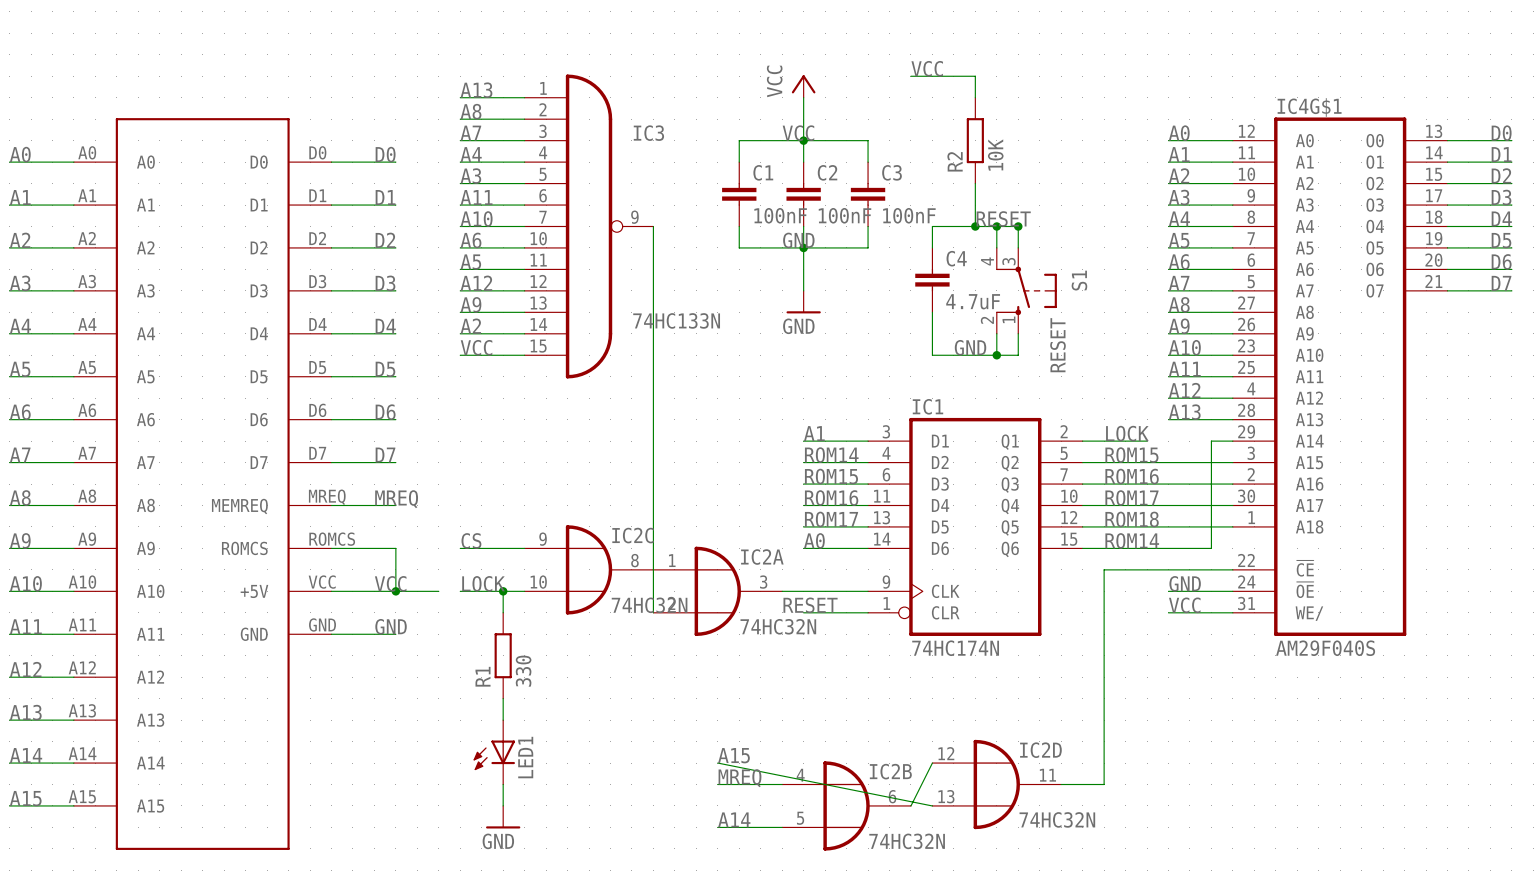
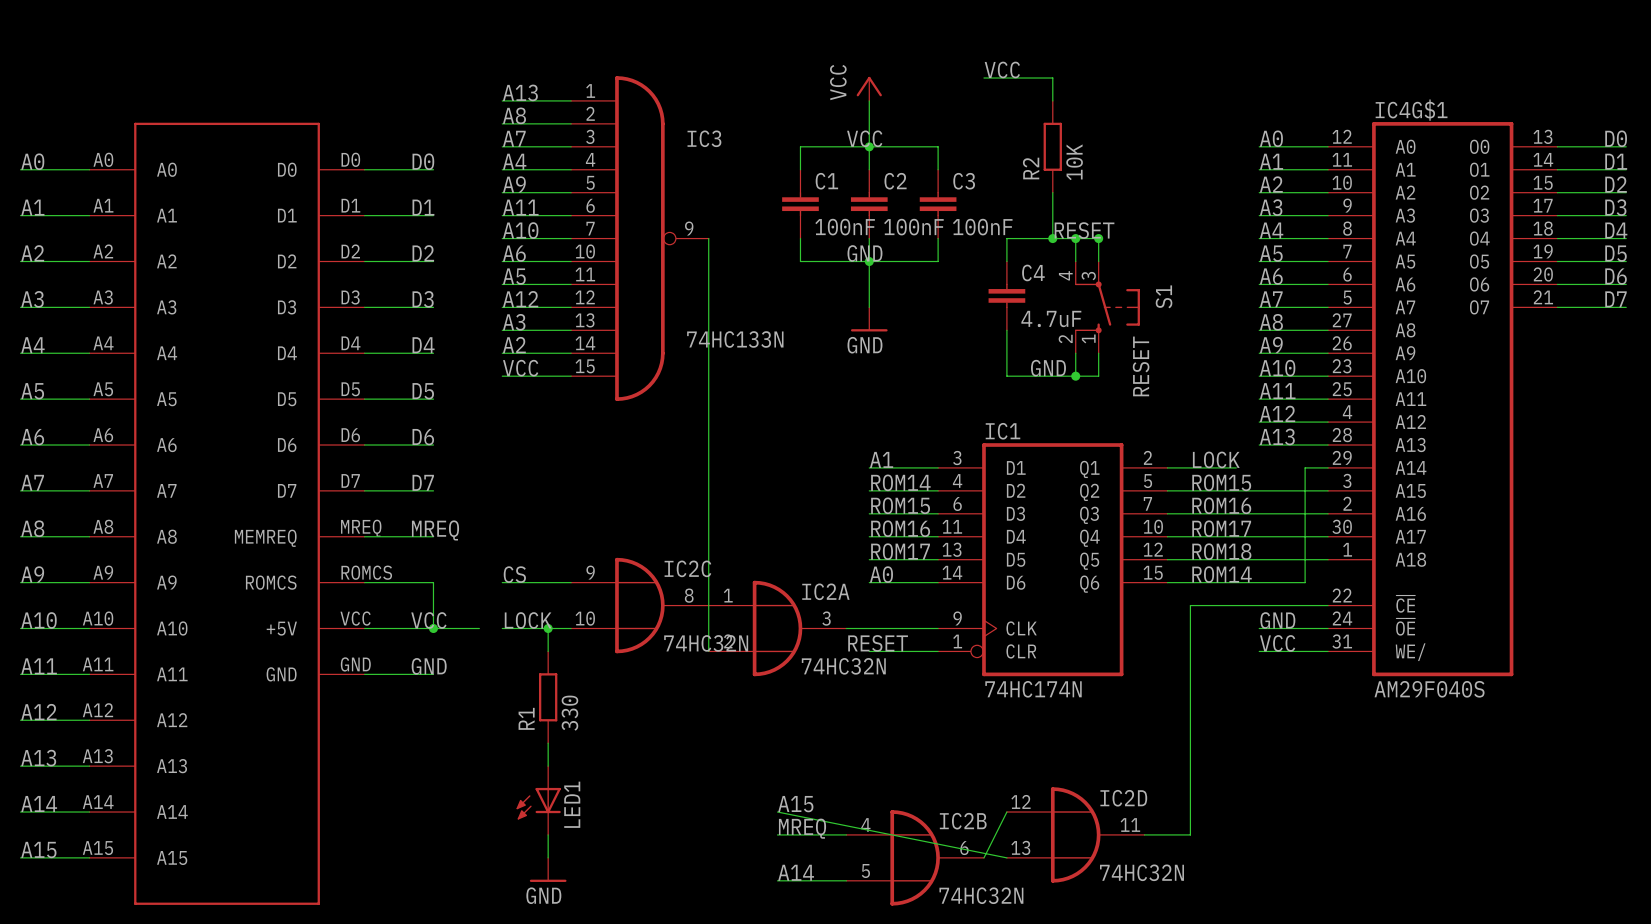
label: A3 (470, 176) -> A9 (514, 184)
label: A9 (470, 304) -> A3 (514, 322)

